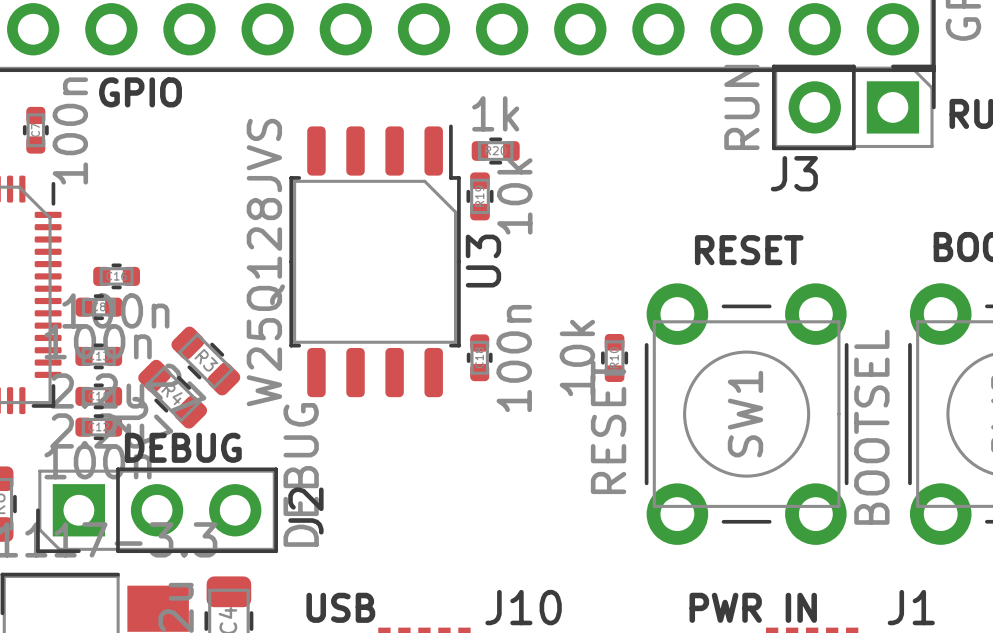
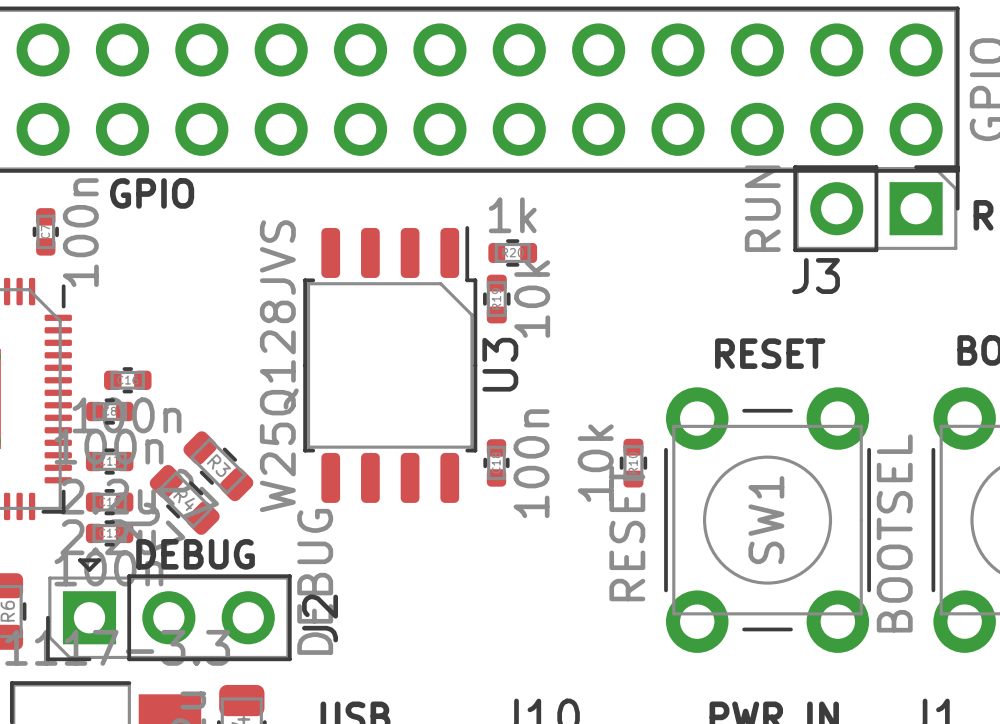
line: none -> (80, 560) (98, 560) (89, 569) (80, 560)

